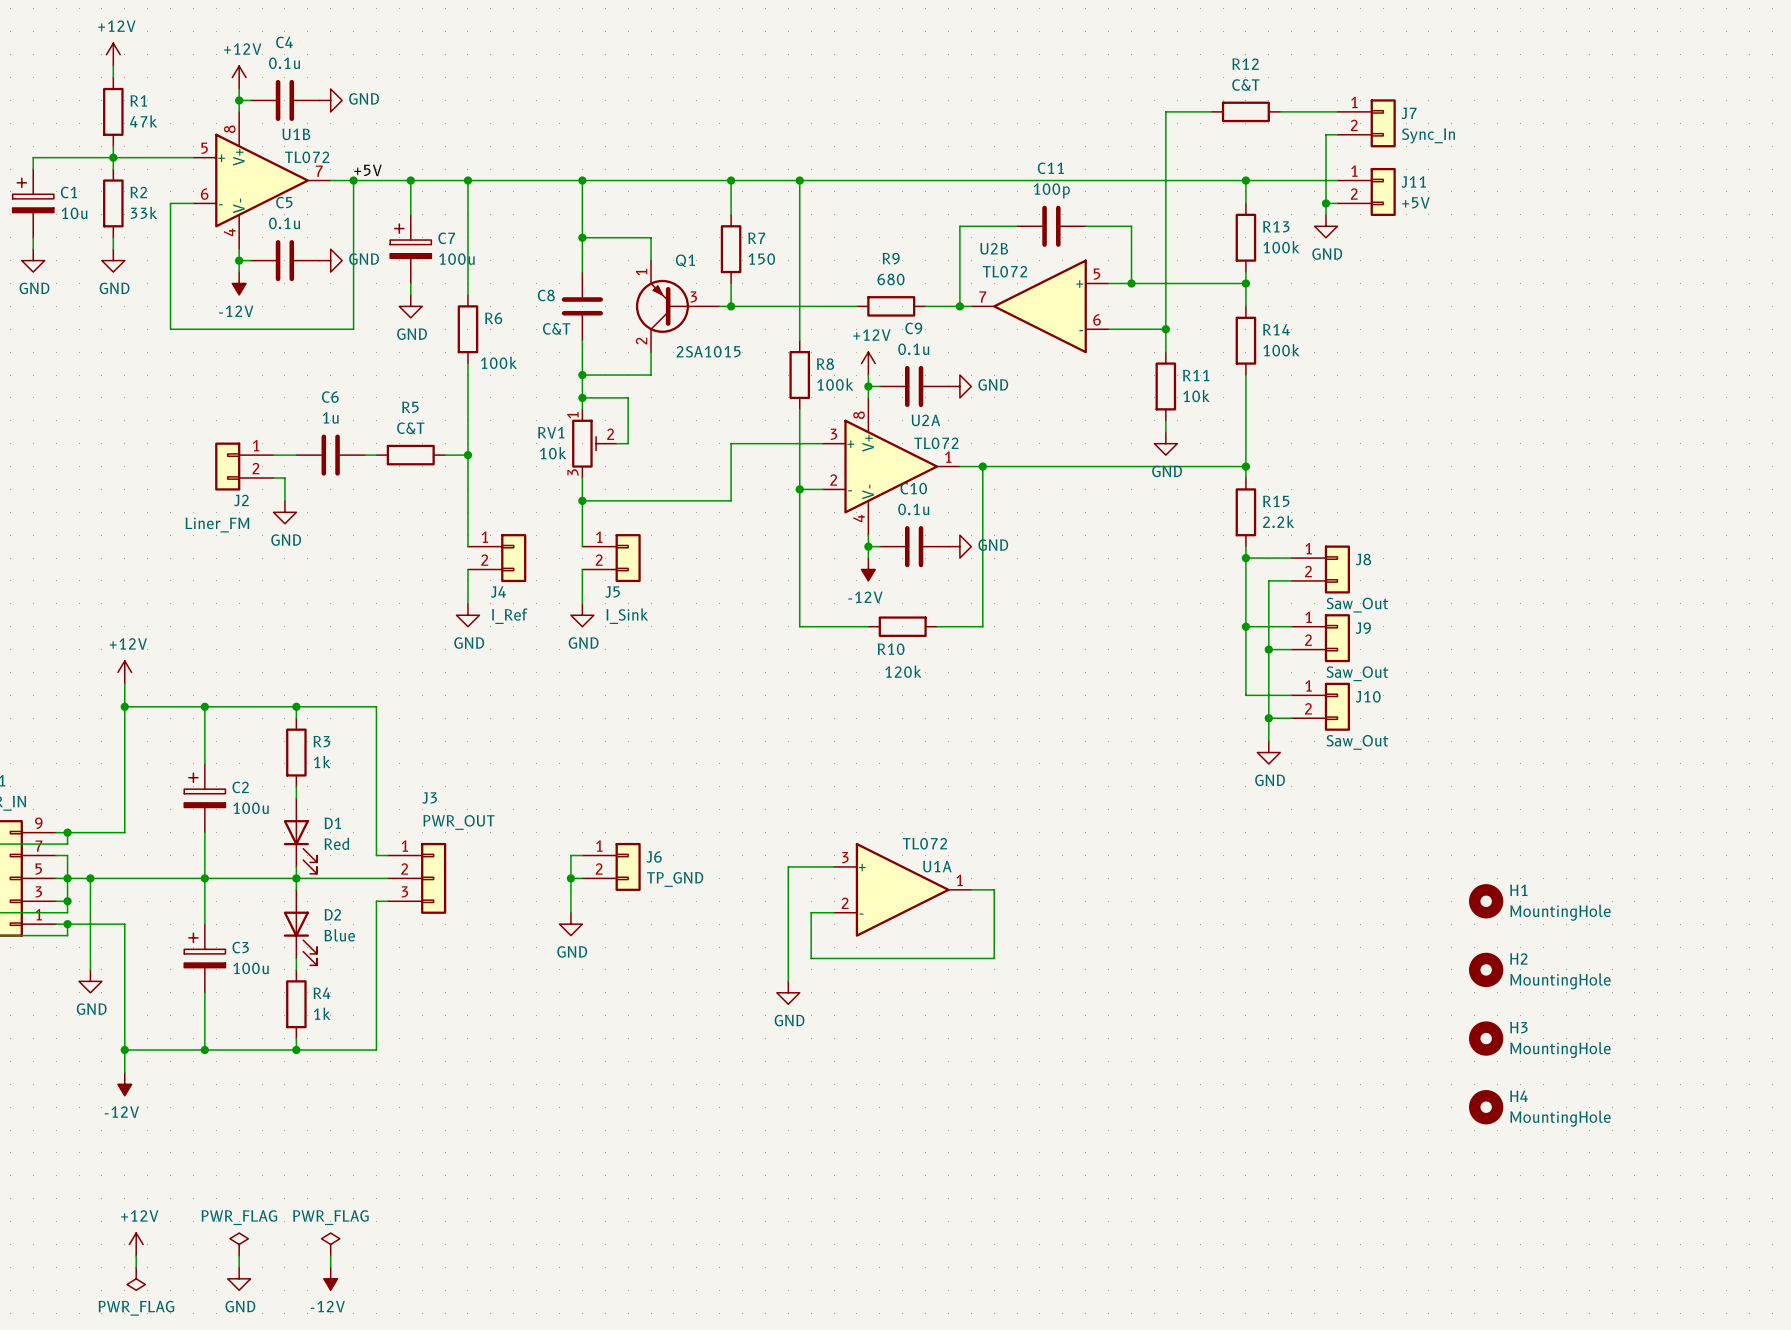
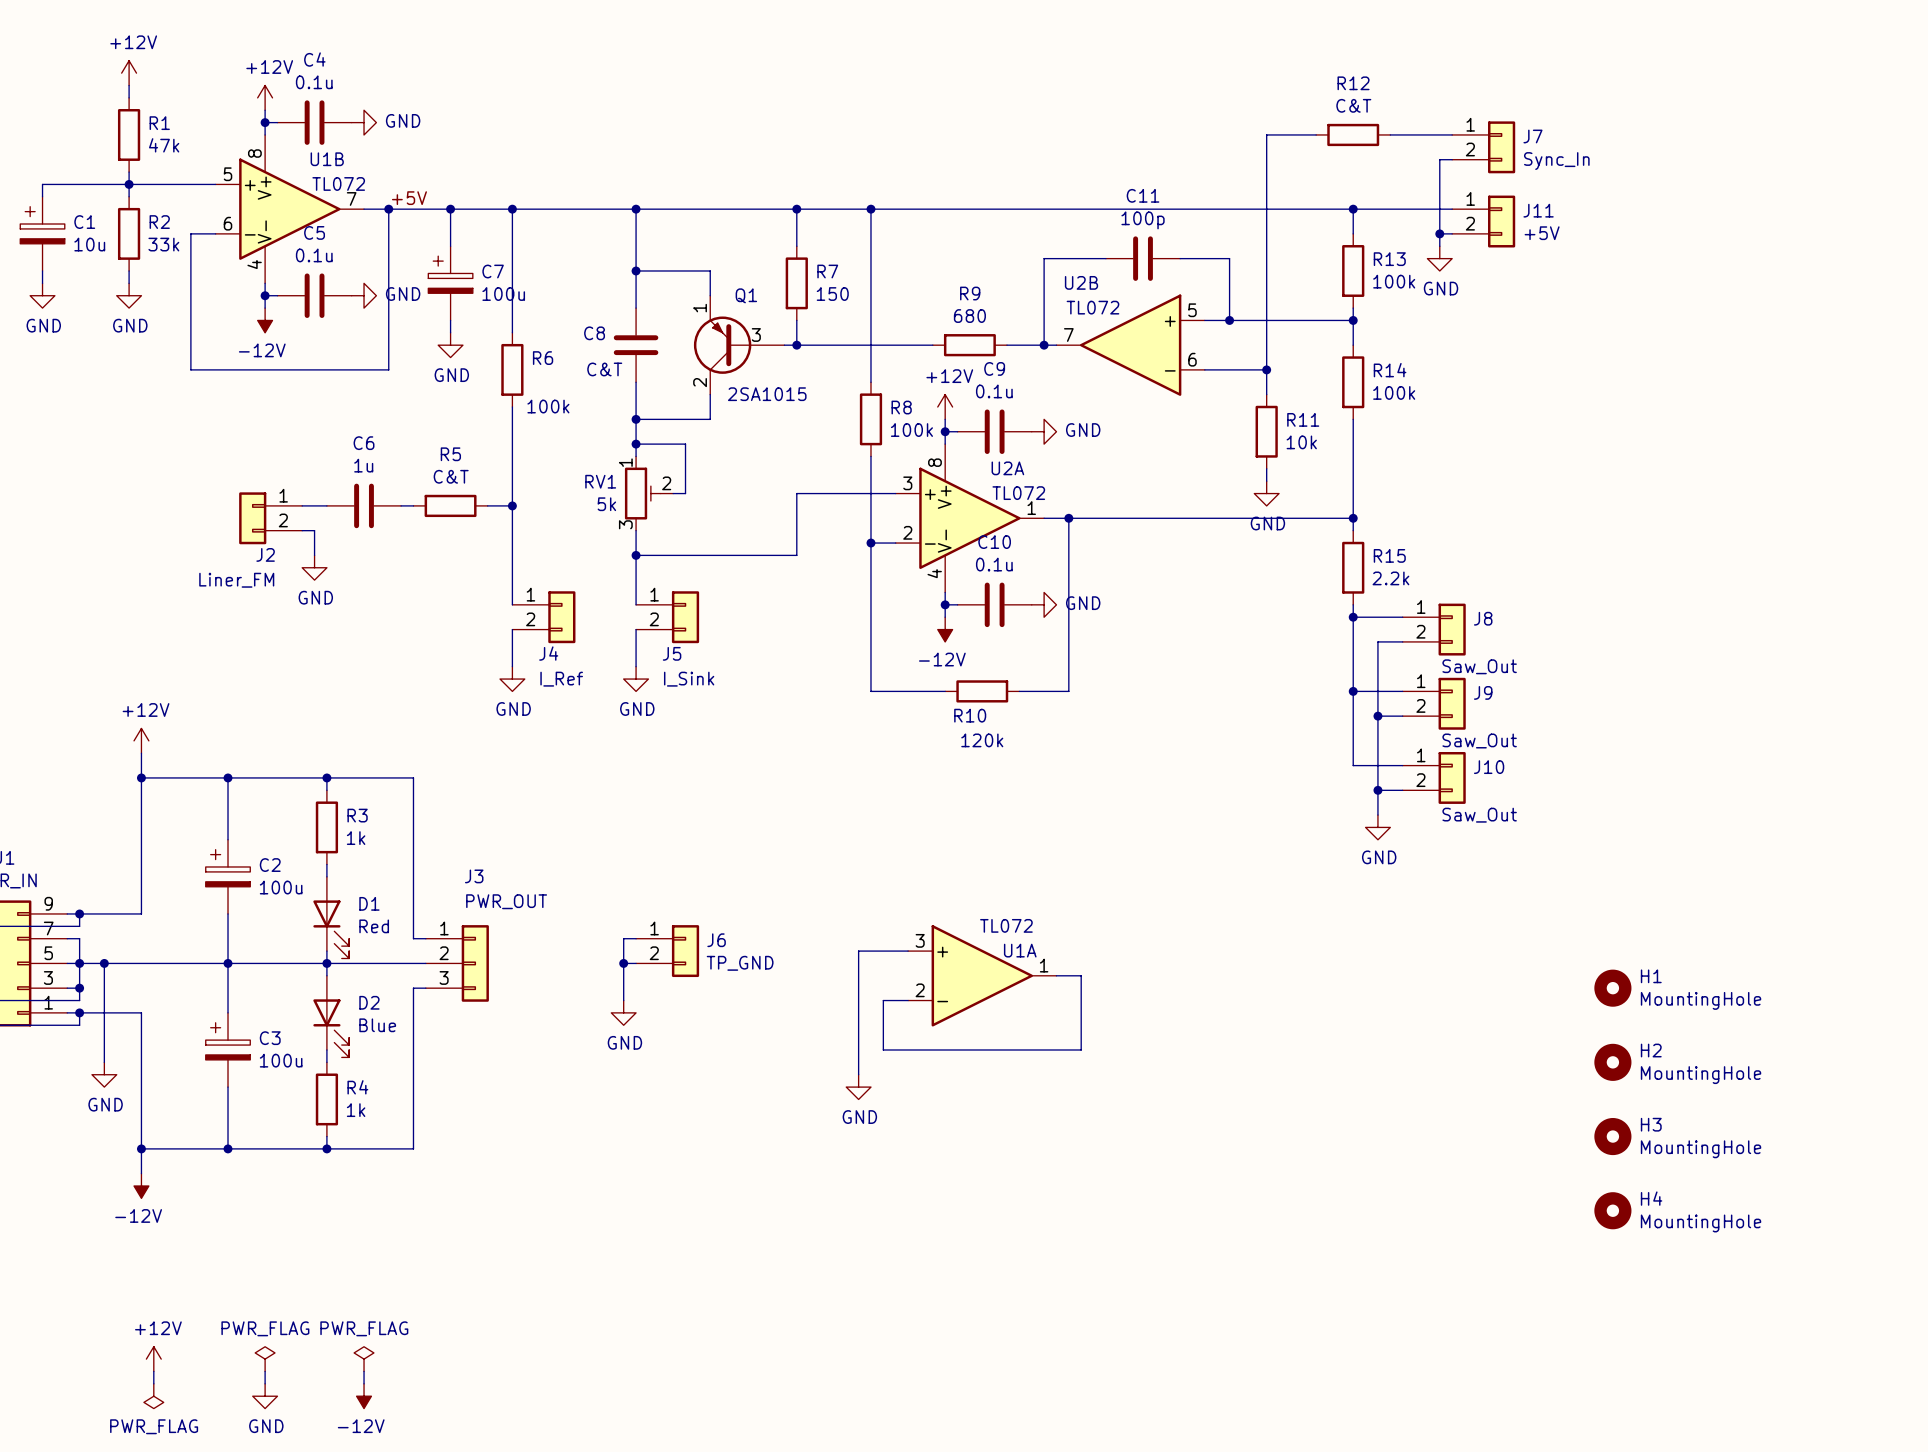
RV1 value: 10k (553, 453) -> 5k (606, 504)

